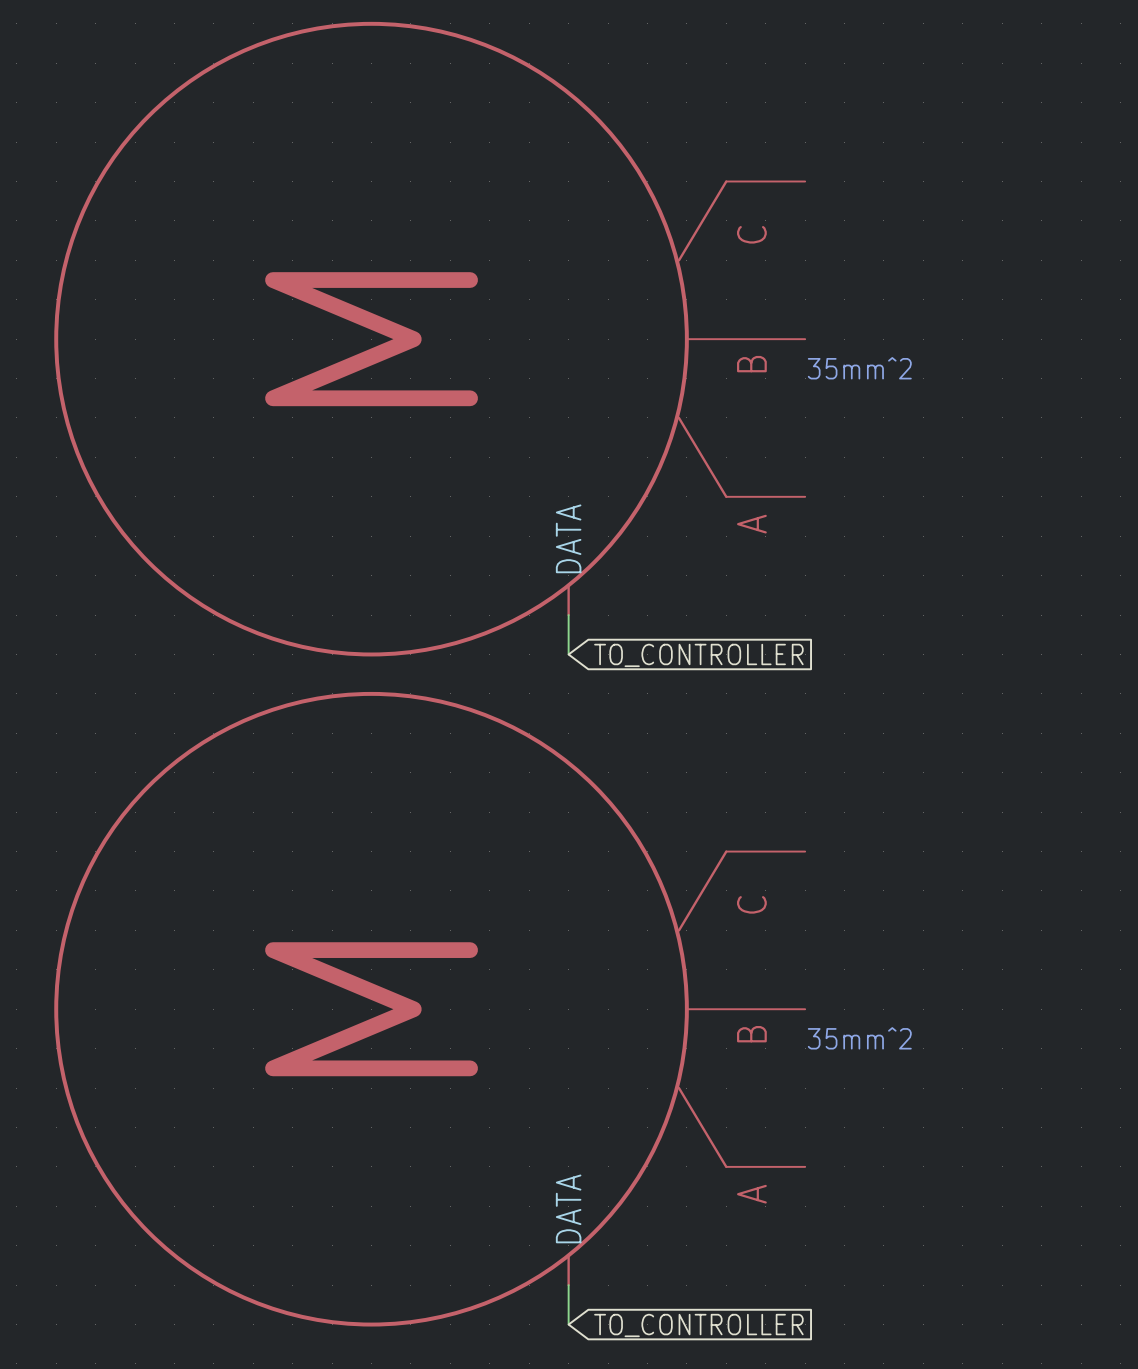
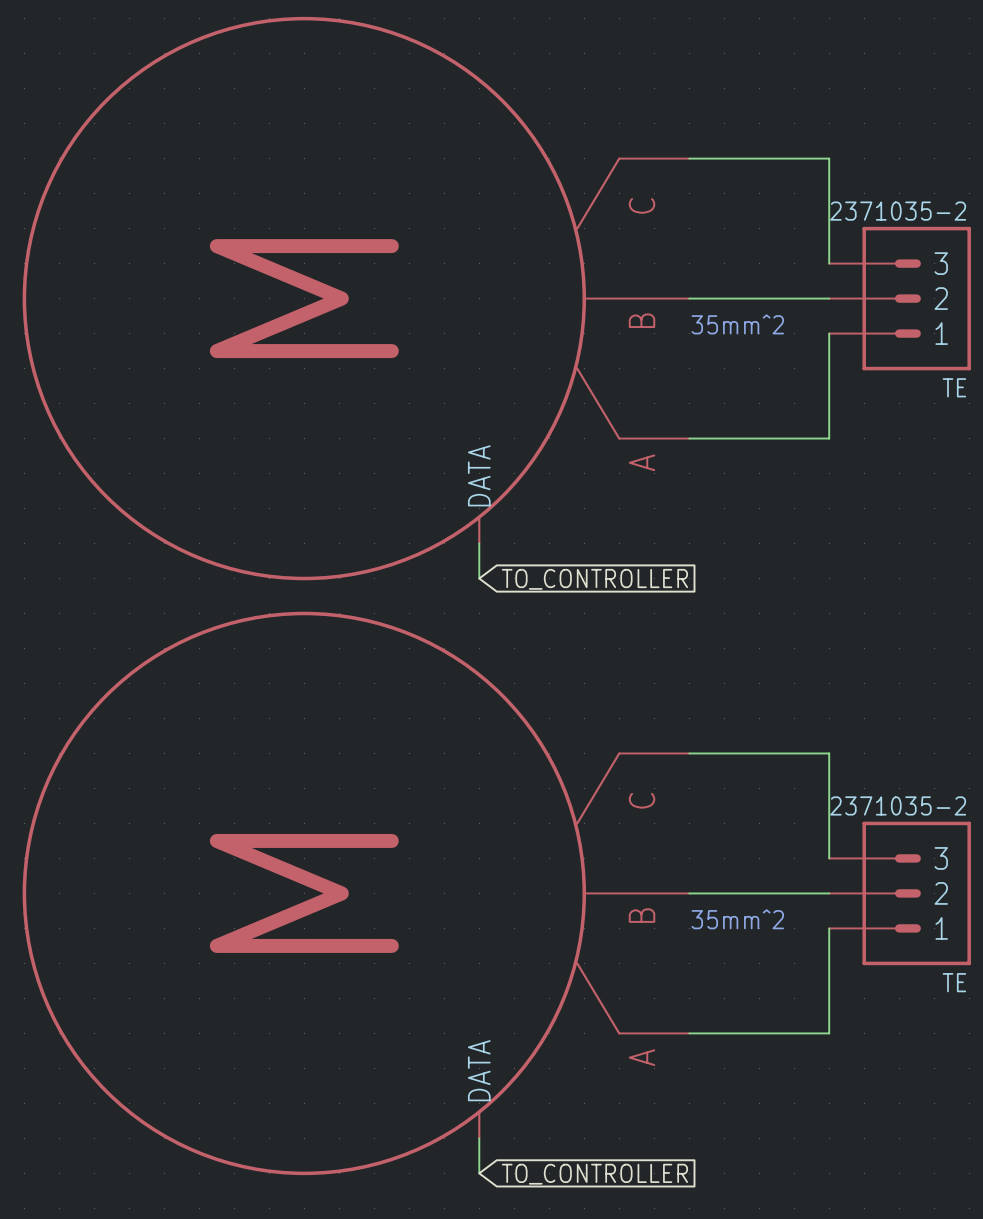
wire: none -> (689, 158) (829, 158) (829, 263)
wire: none -> (689, 298) (829, 298)
part: none -> (900, 298)
wire: none -> (829, 333) (829, 438) (689, 438)
wire: none -> (689, 753) (829, 753) (829, 858)
wire: none -> (689, 893) (829, 893)
part: none -> (900, 893)
wire: none -> (829, 928) (829, 1033) (689, 1033)

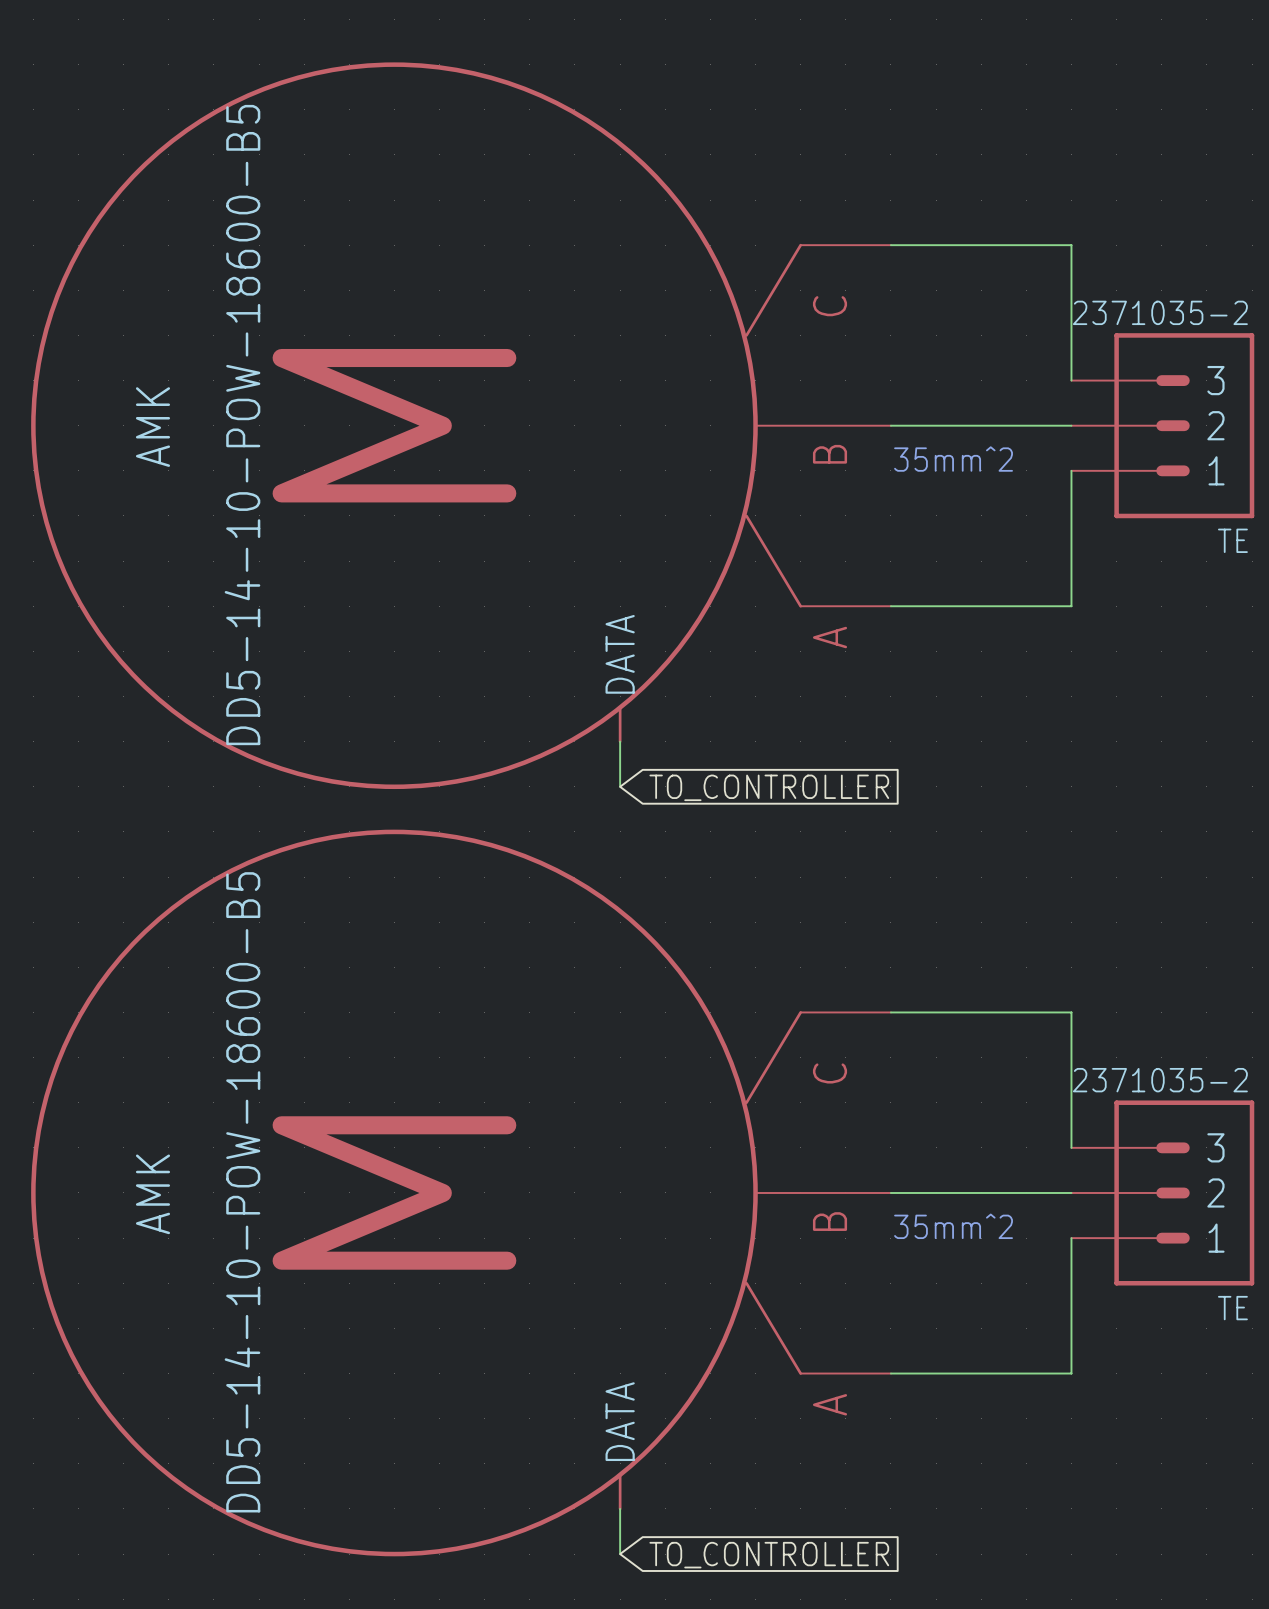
part text: none -> DD5-14-10-POW-18600-B5 (242, 425)
part text: none -> AMK (152, 427)
part text: none -> DD5-14-10-POW-18600-B5 (242, 1192)
part text: none -> AMK (152, 1194)

